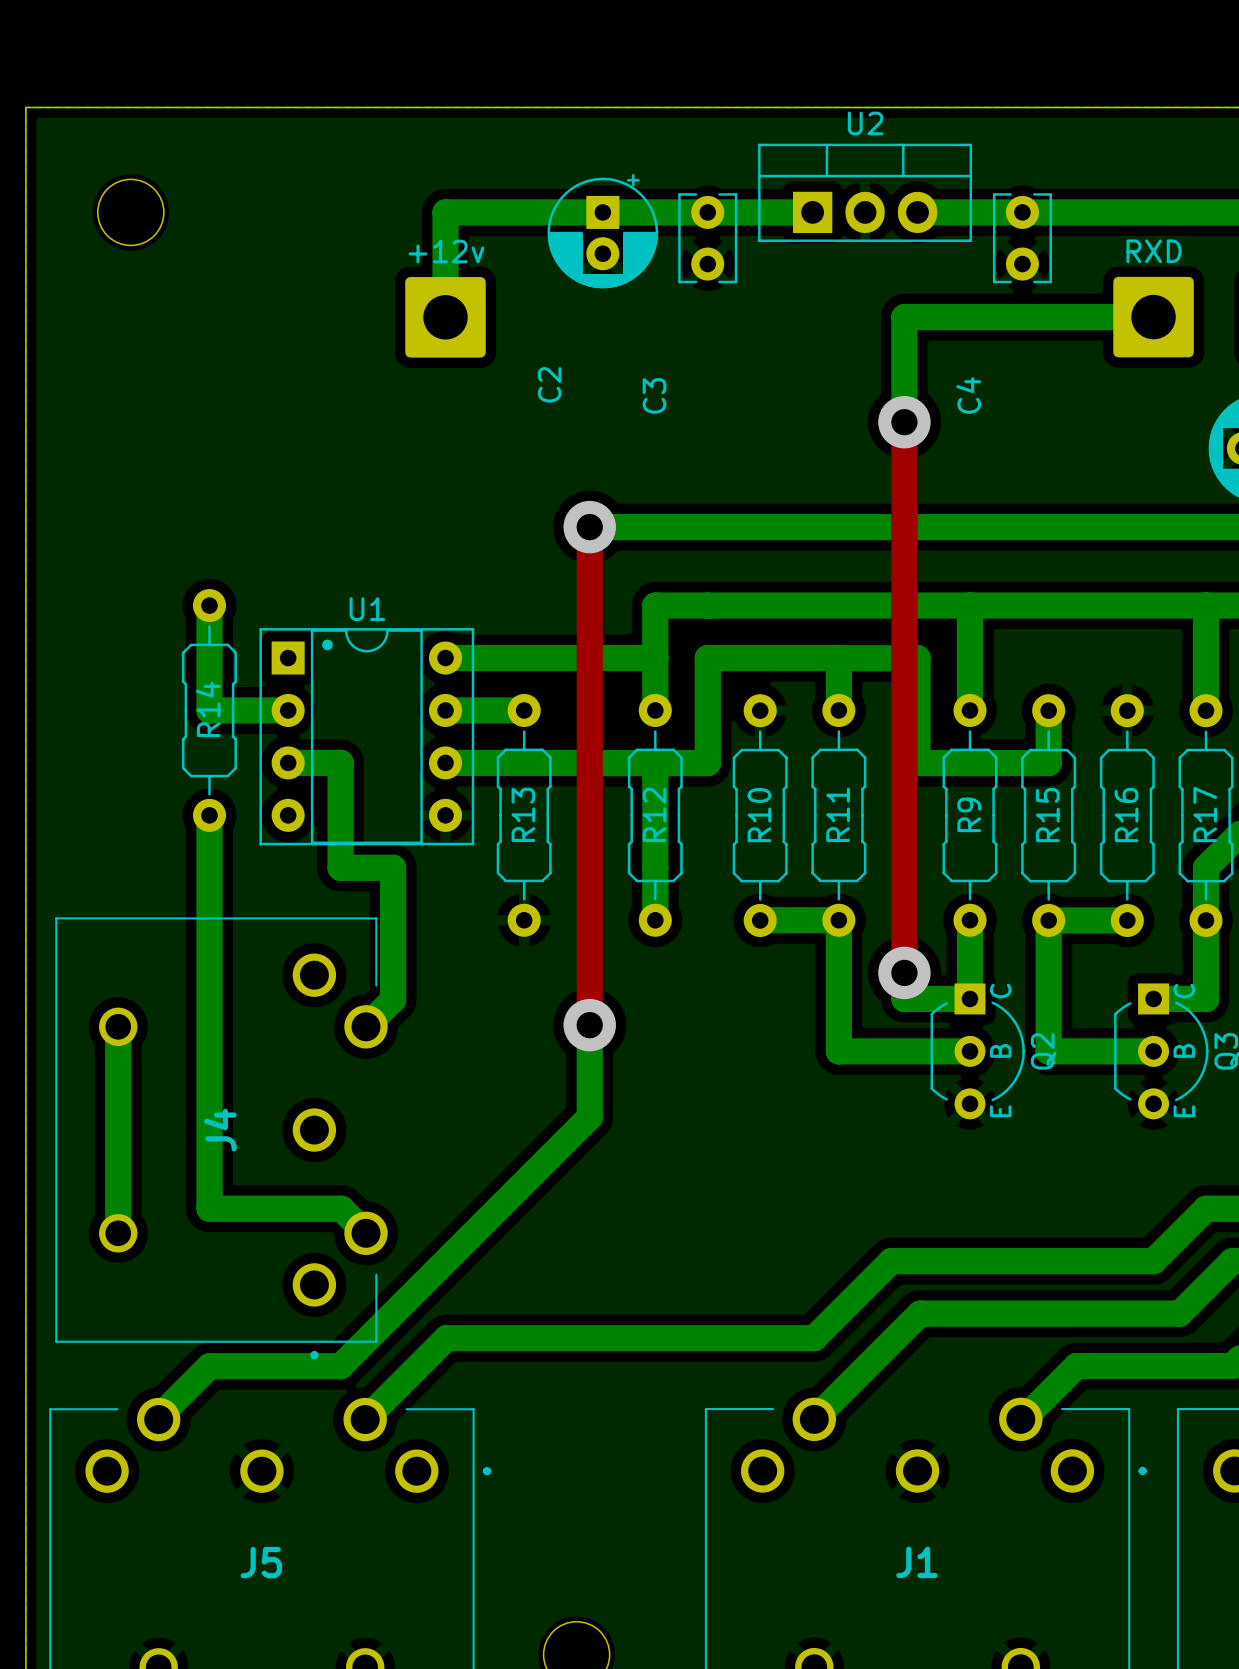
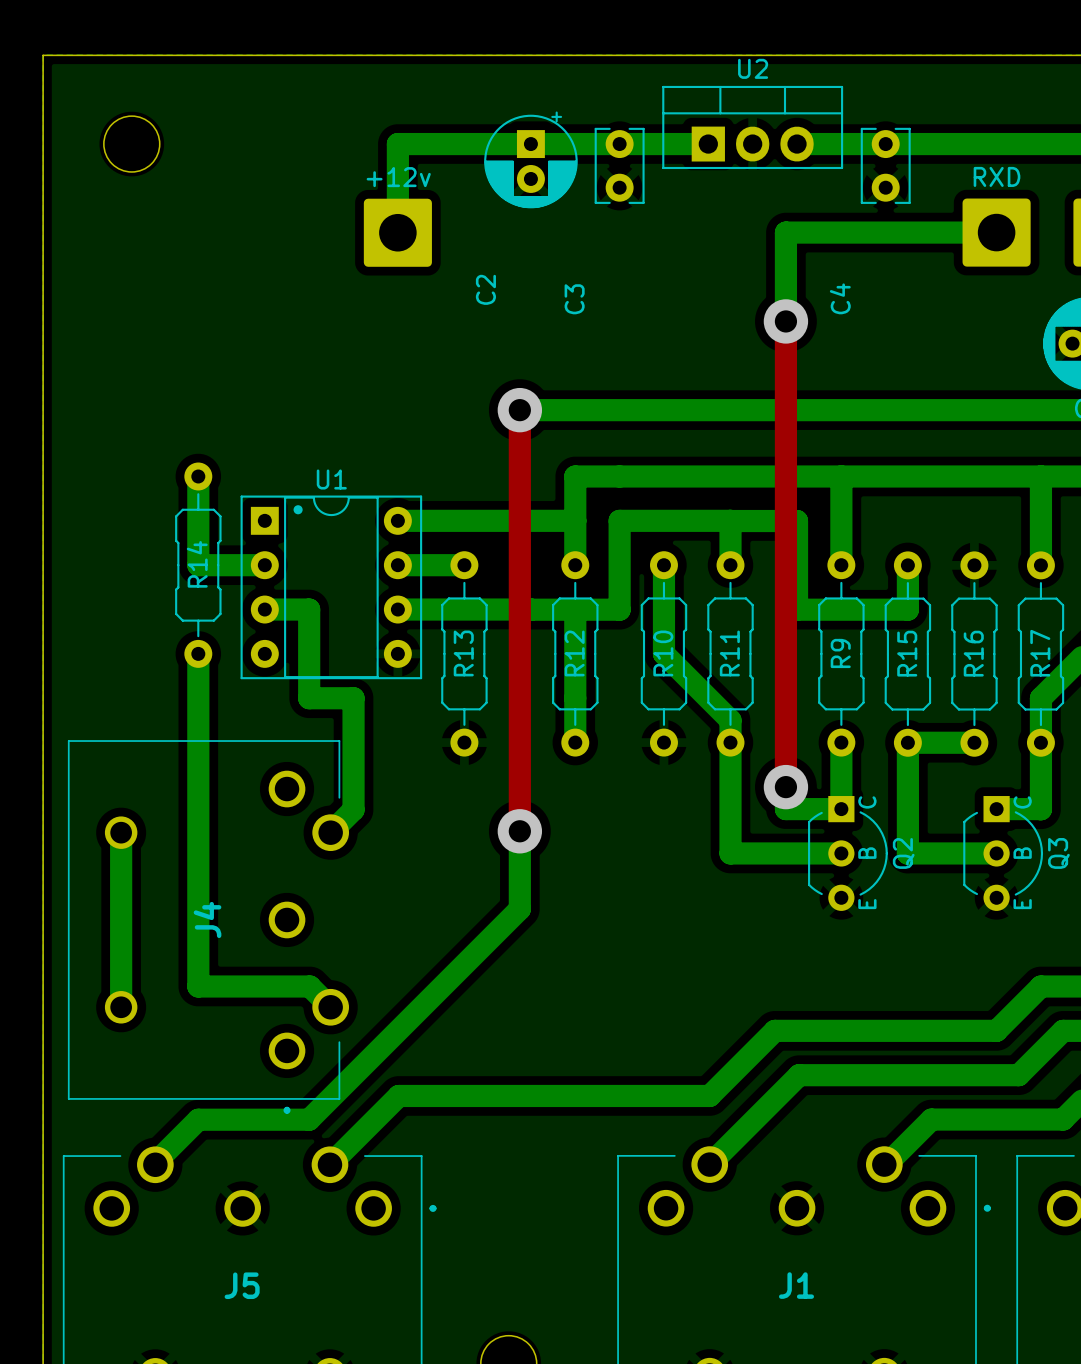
bottom track: (760, 920) (838, 920) -> (663, 565) (663, 653) (730, 720) (730, 742)

